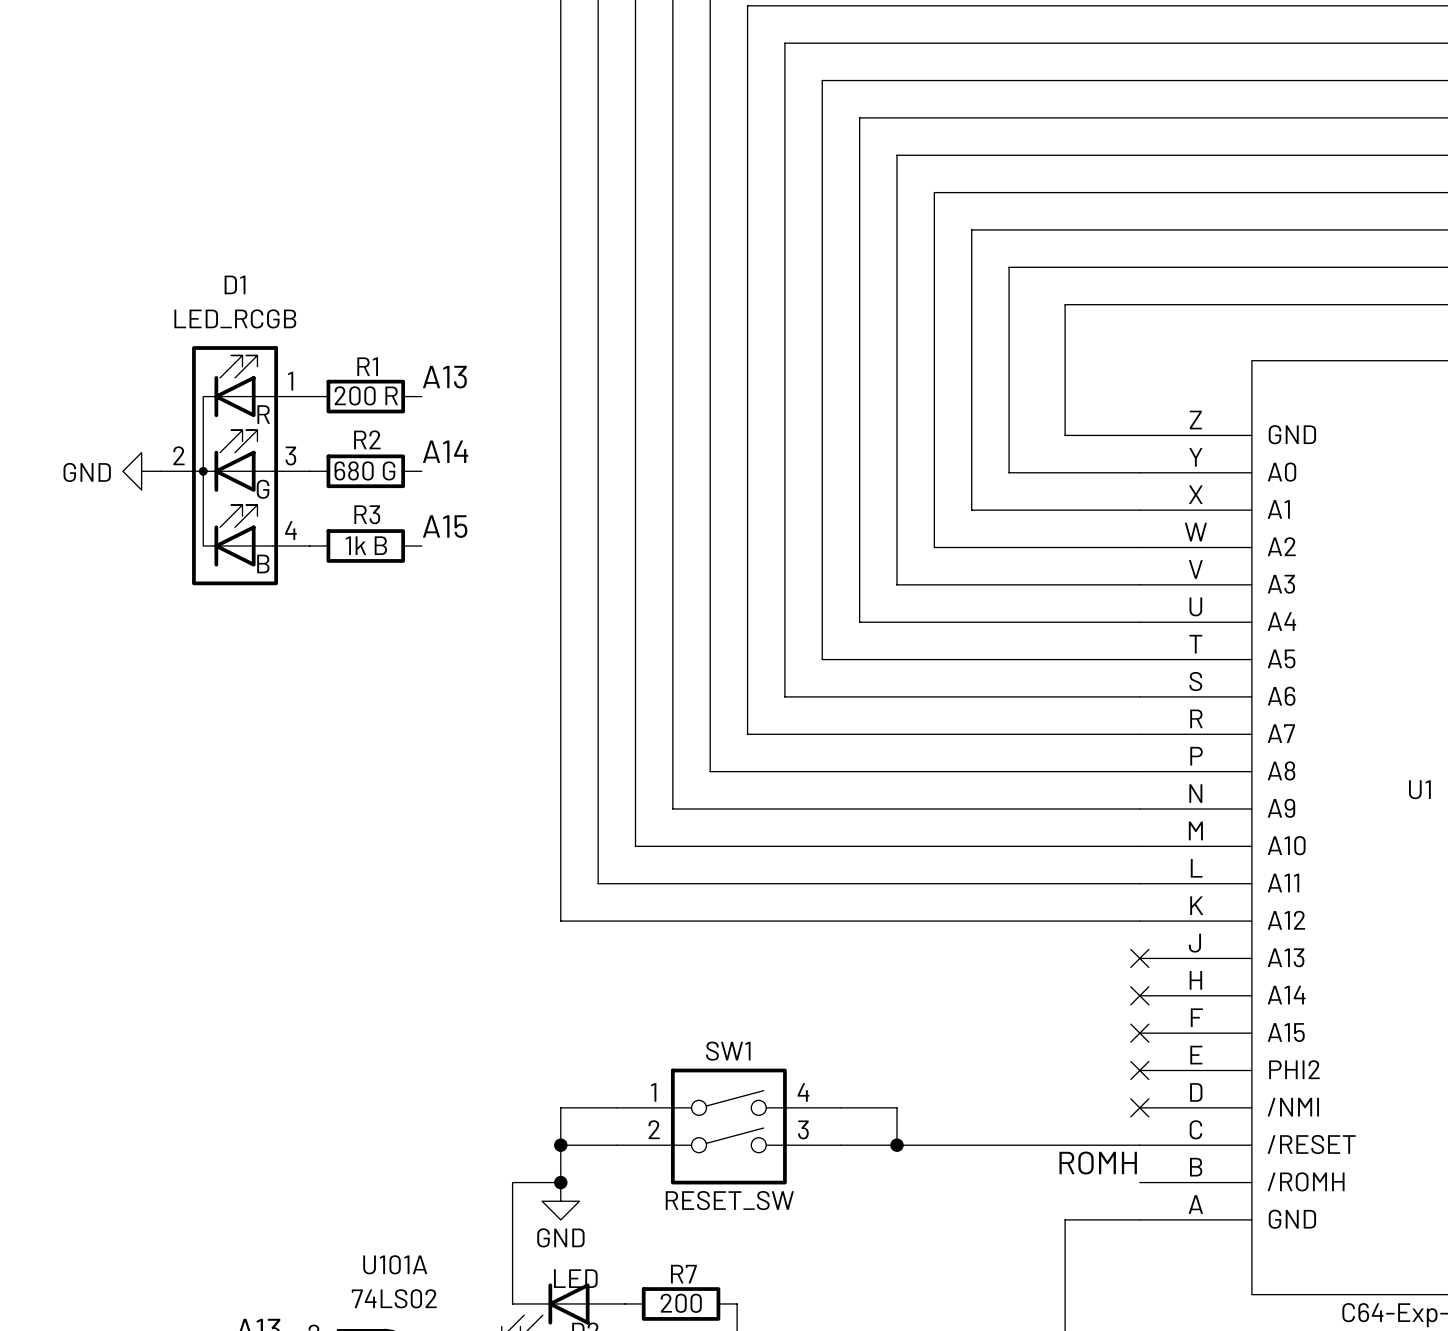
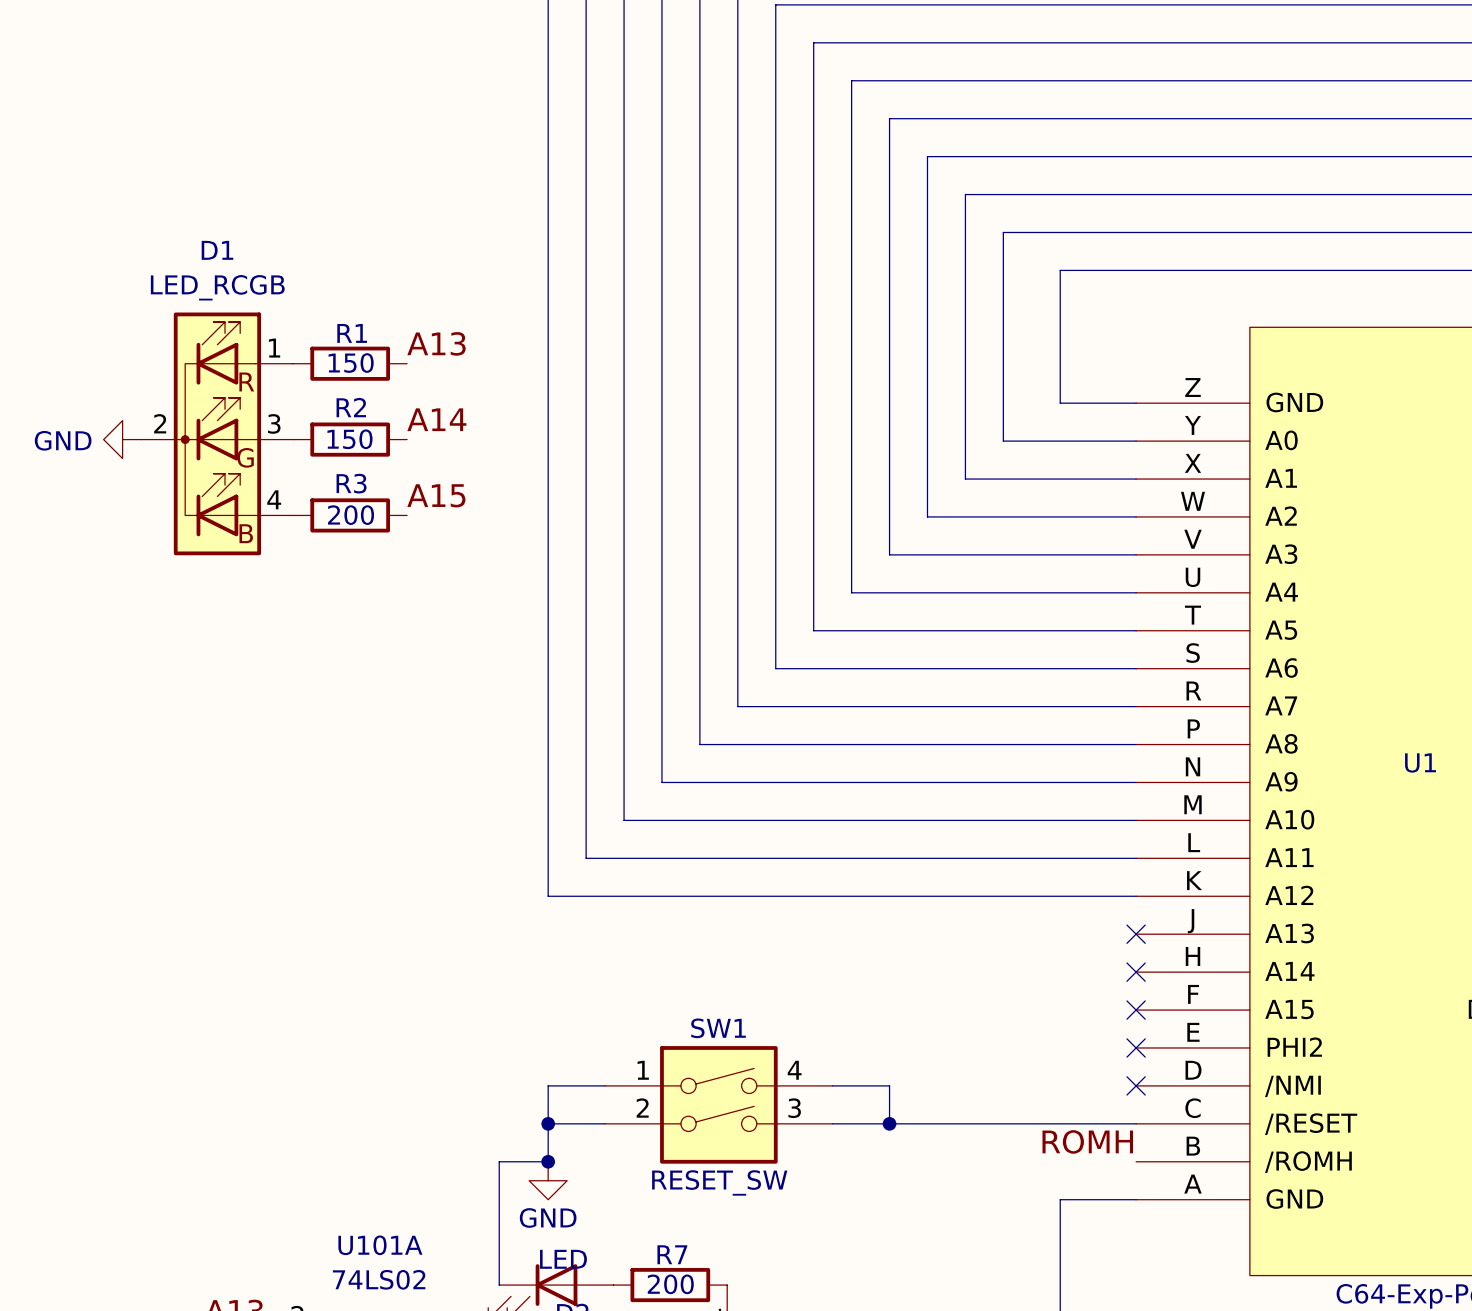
R1 value: 200 R (366, 395) -> 150 (351, 363)
R2 value: 680 G (364, 470) -> 150 (349, 439)
R3 value: 1k B (366, 545) -> 200 (351, 515)

